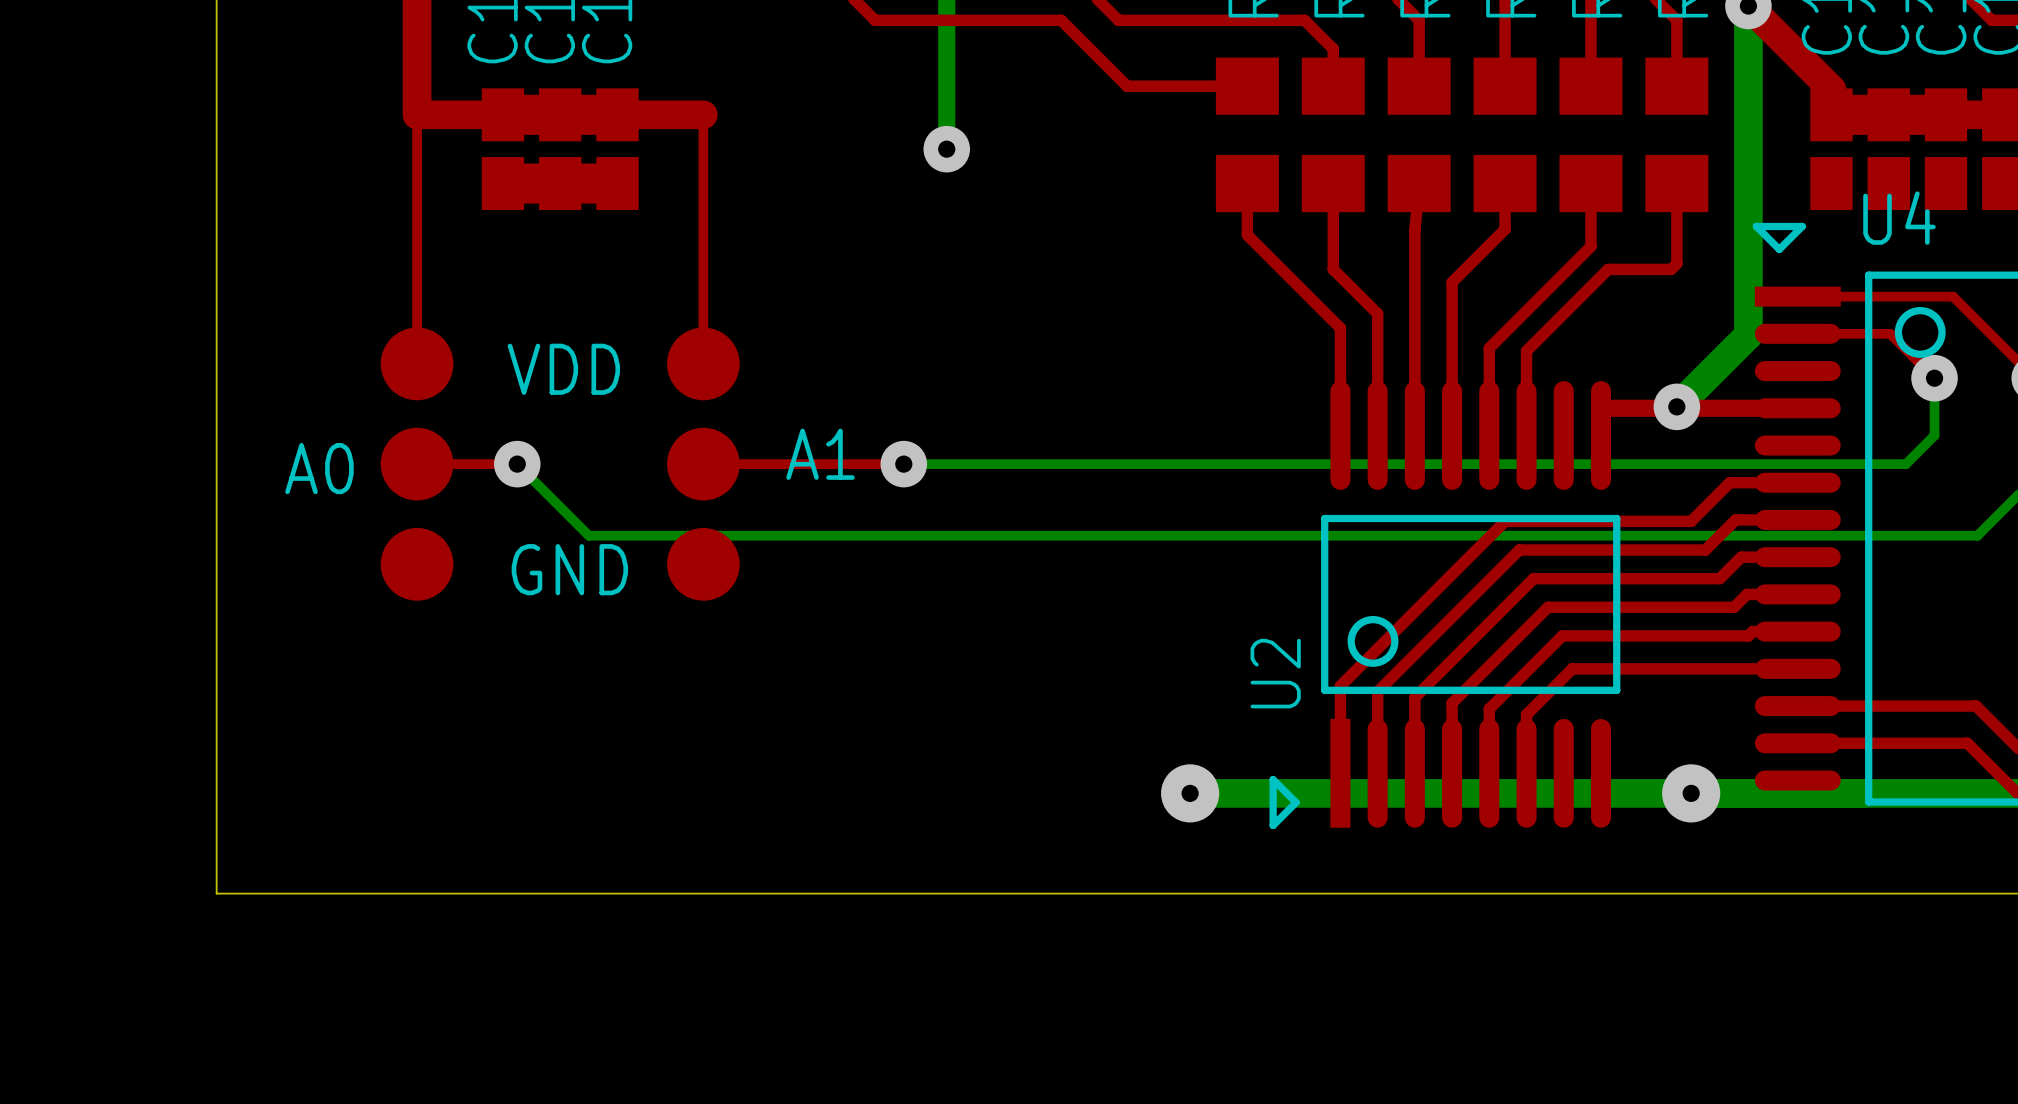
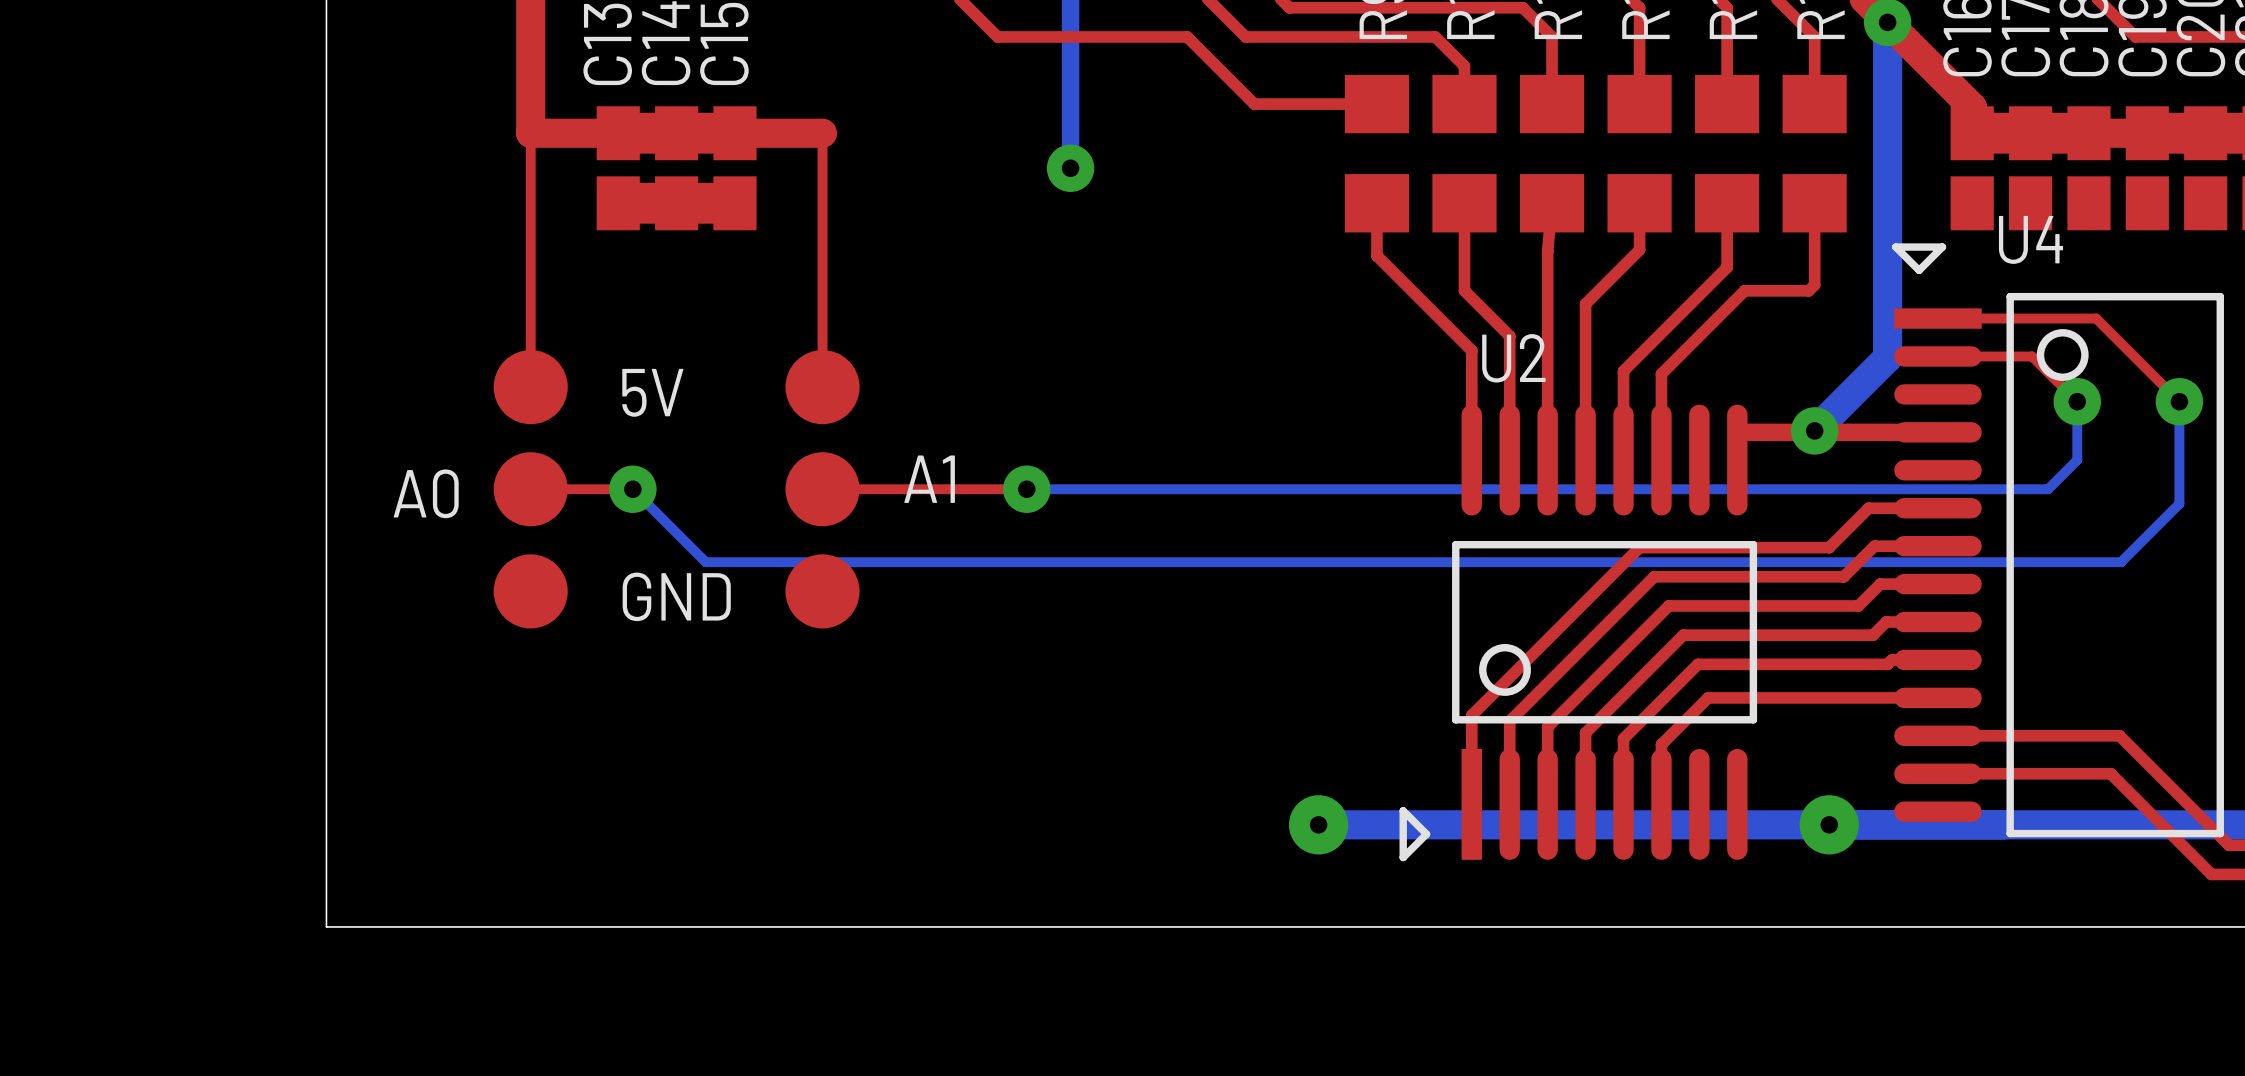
VDD name: VDD (563, 369) -> 5V (652, 392)
U2 name rotation: 0° (1275, 673) -> 90° clockwise (1513, 358)
U2 name position: U2 (1275, 673) -> U2 (1513, 358)

